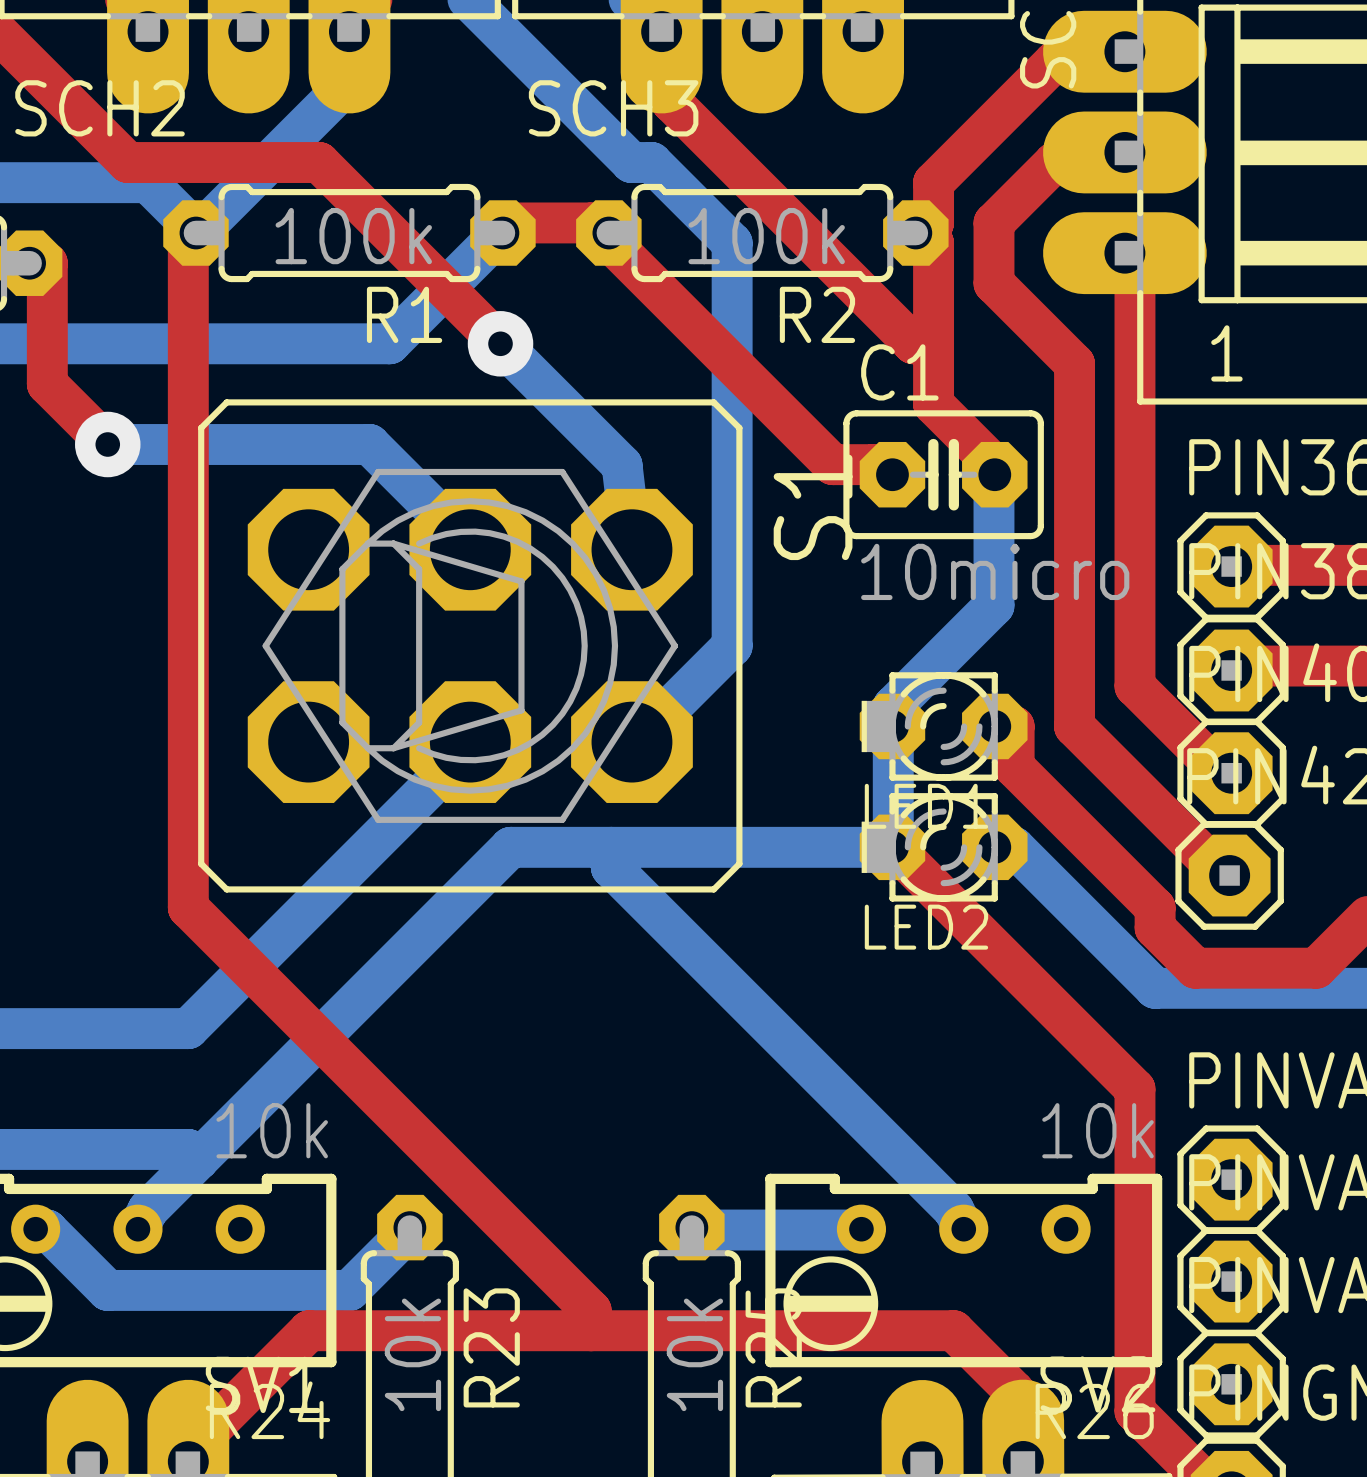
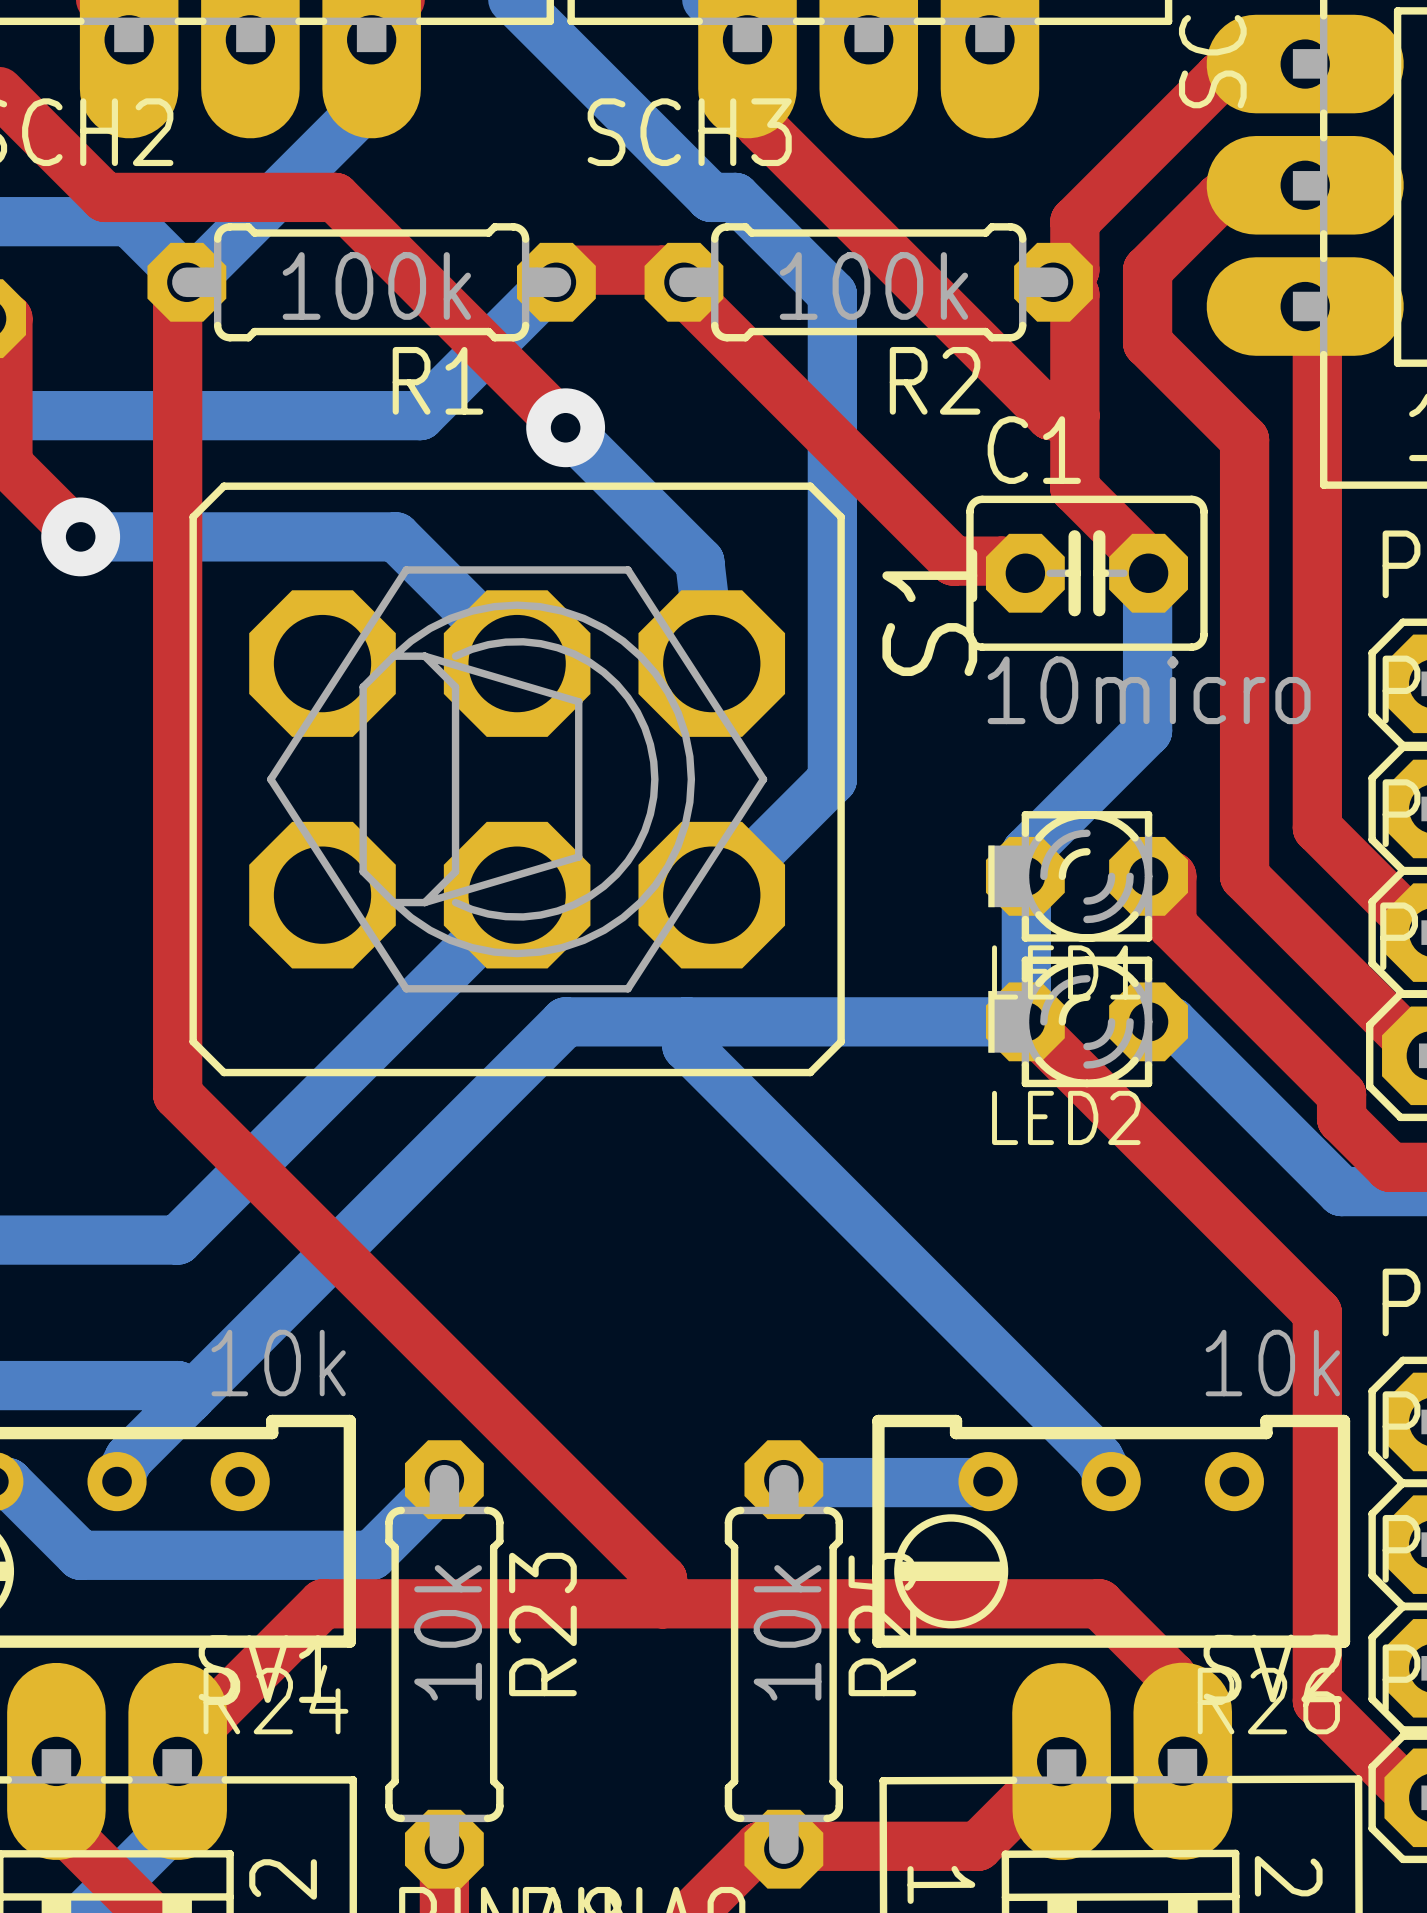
via position: (500, 343) -> (565, 427)

